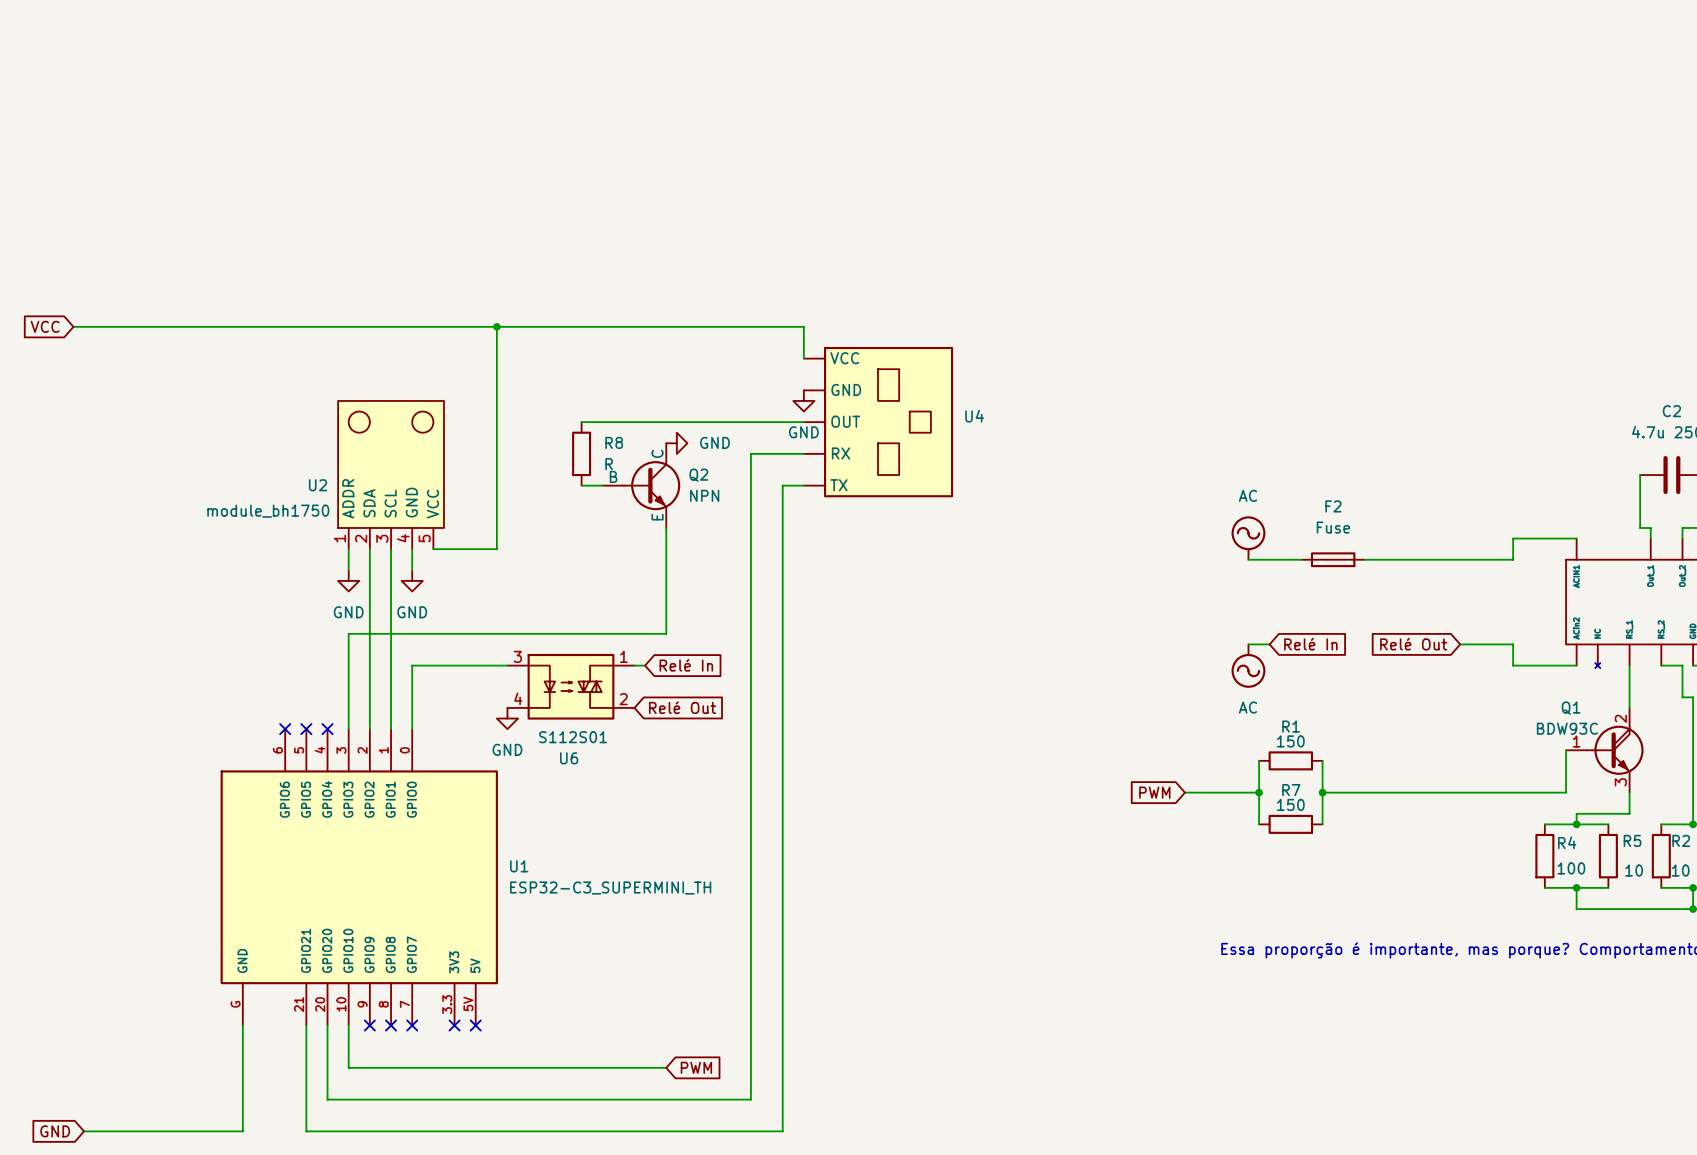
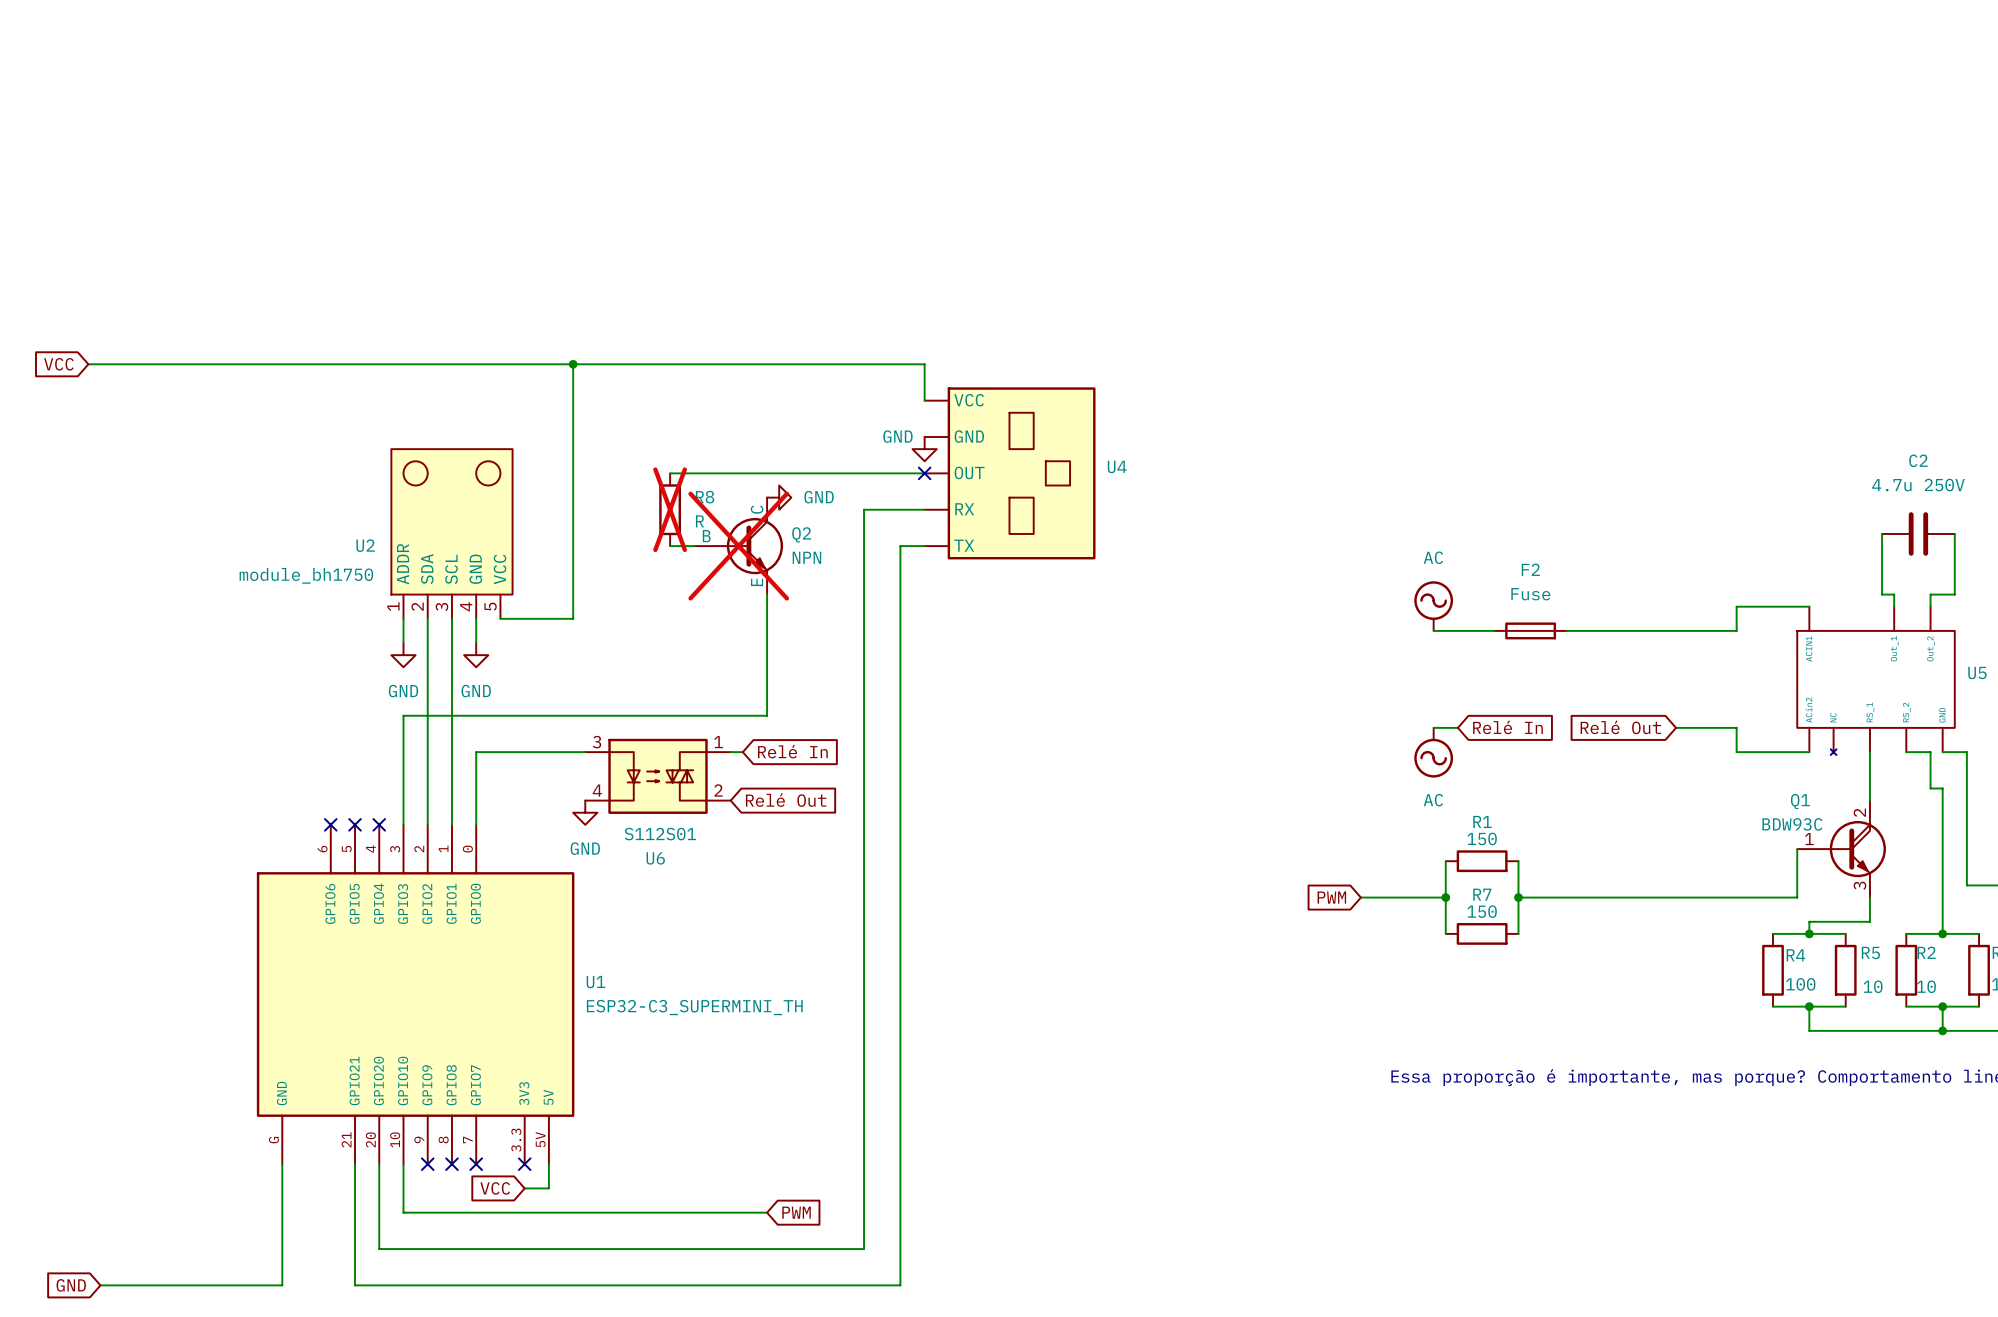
no-connect mark: none -> (924, 473)
power symbol text position: GND (803, 432) -> GND (897, 436)
R8 do-not-place cross: none -> (670, 509)
Q2 do-not-place cross: none -> (738, 546)
wire: none -> (548, 1164) (548, 1188) (524, 1188)
no-connect mark: (475, 1025) -> none
global label: none -> VCC (495, 1188)

